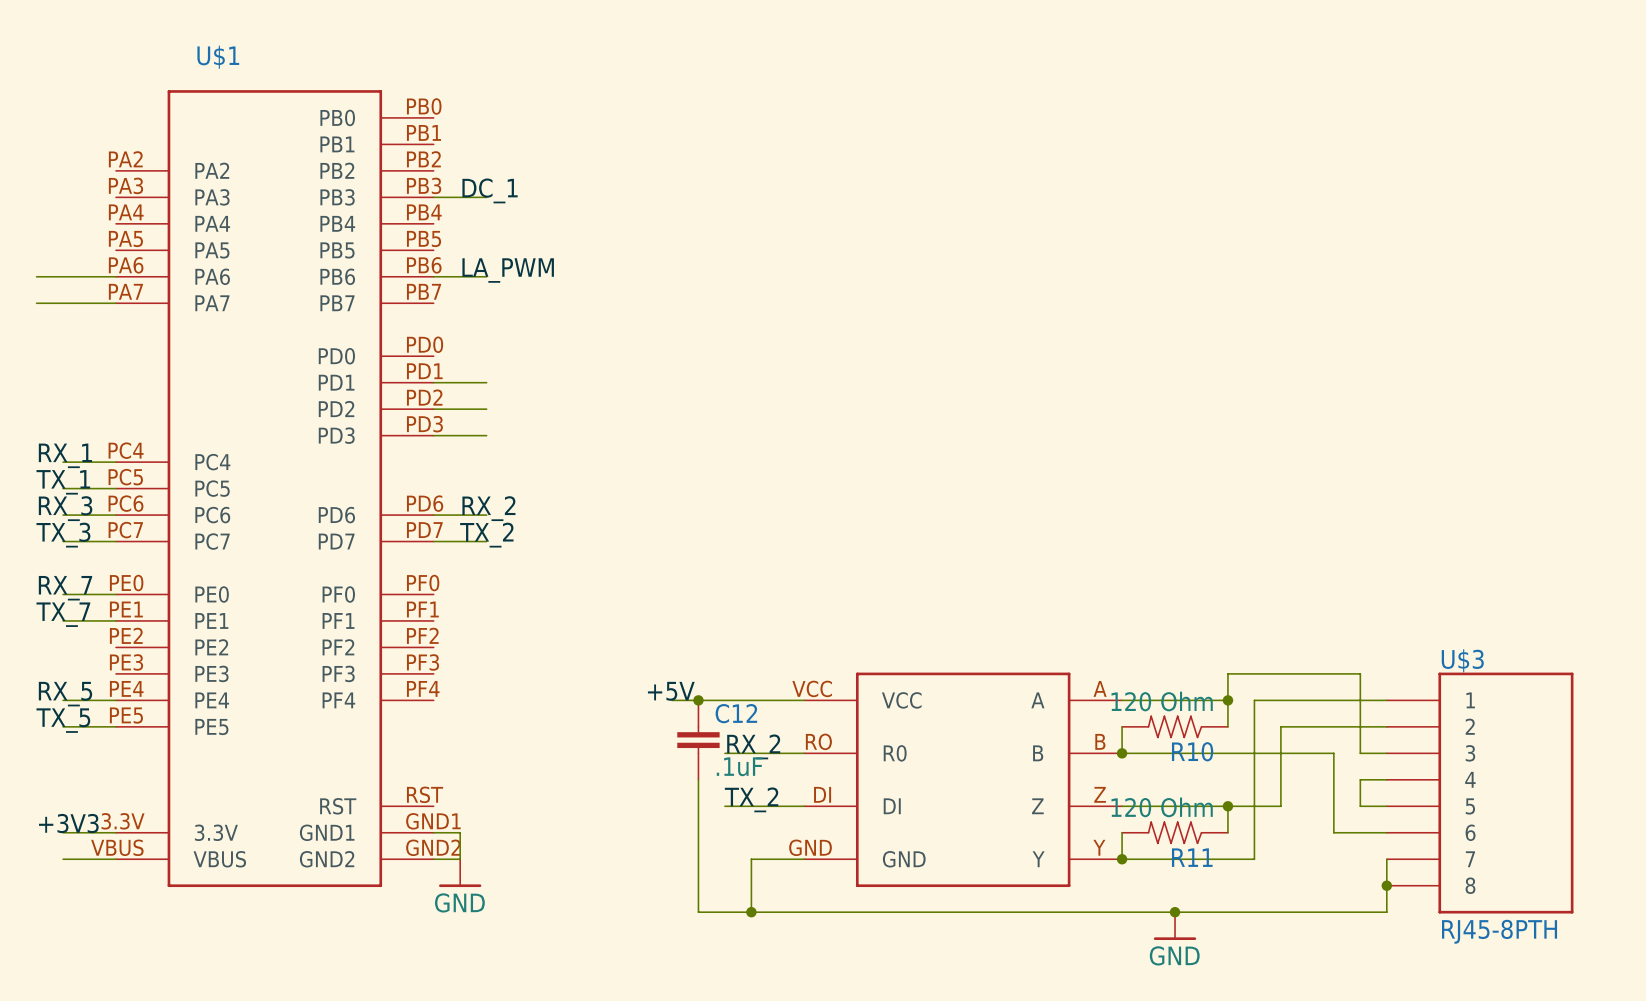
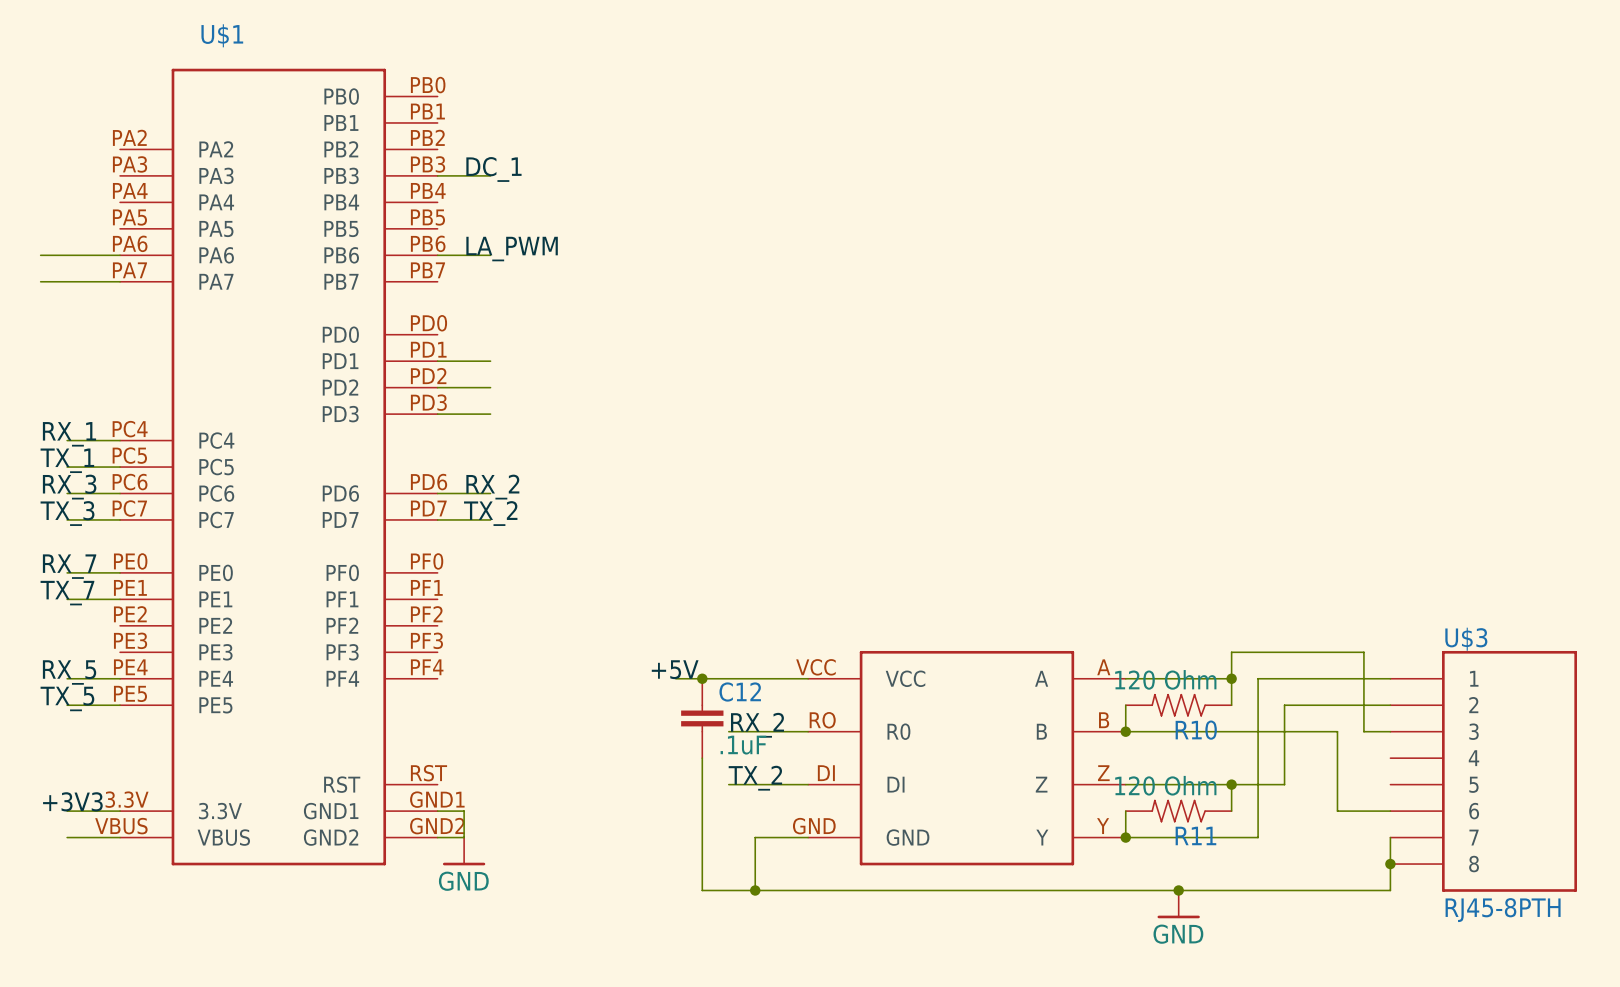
wire: (1386, 779) (1360, 779) (1360, 806) (1386, 806) -> none

